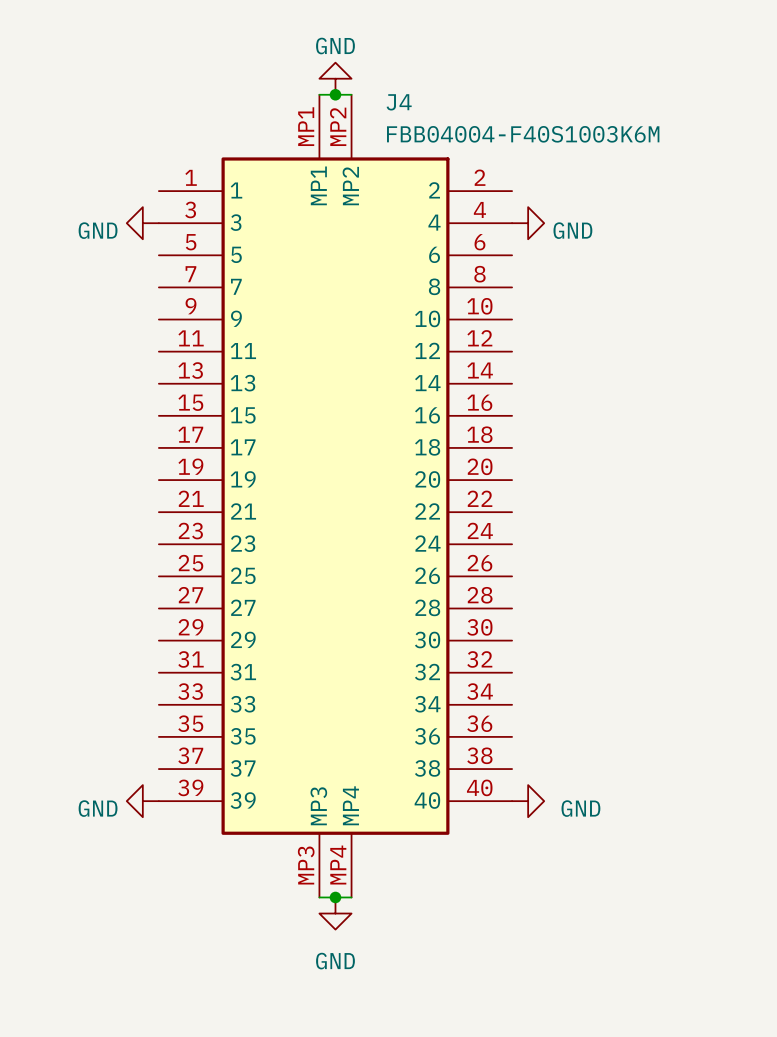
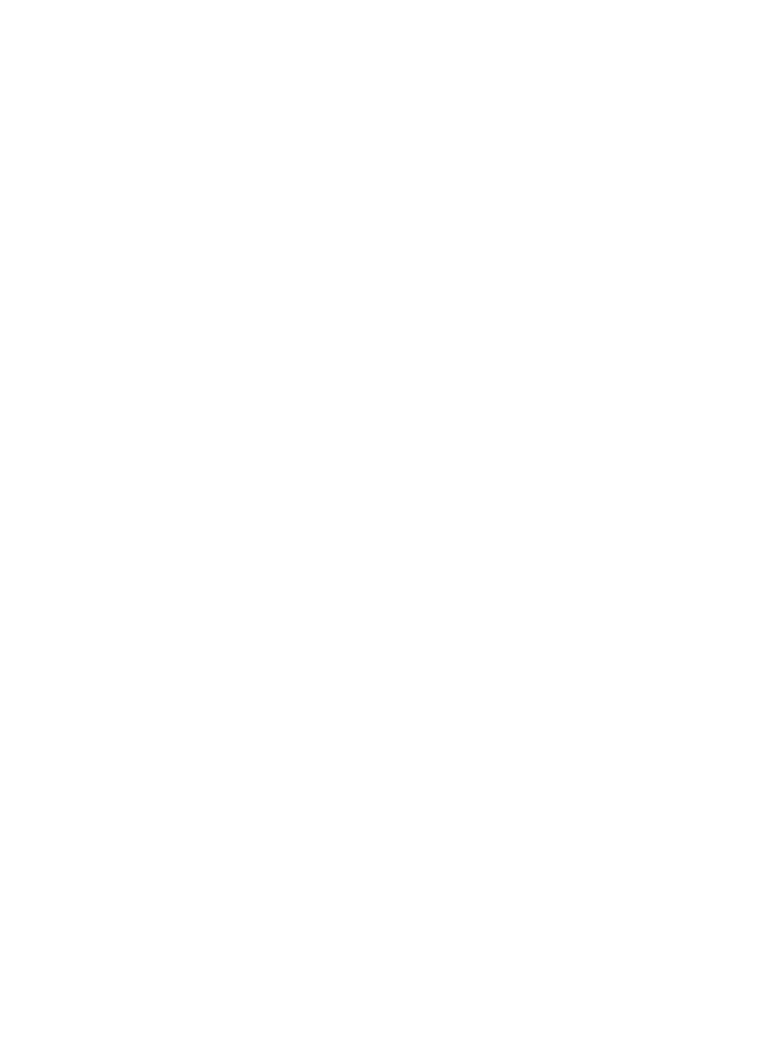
power symbol: GND (335, 78) -> none
wire: (319, 94) (351, 94) -> none
junction: (335, 94) -> none
power symbol: GND (142, 223) -> none
power symbol: GND (528, 223) -> none
J4: FBB04004-F40S1003K6M (335, 496) -> none
power symbol: GND (142, 801) -> none
power symbol: GND (528, 801) -> none
wire: (319, 897) (351, 897) -> none
junction: (335, 897) -> none
power symbol: GND (335, 913) -> none

